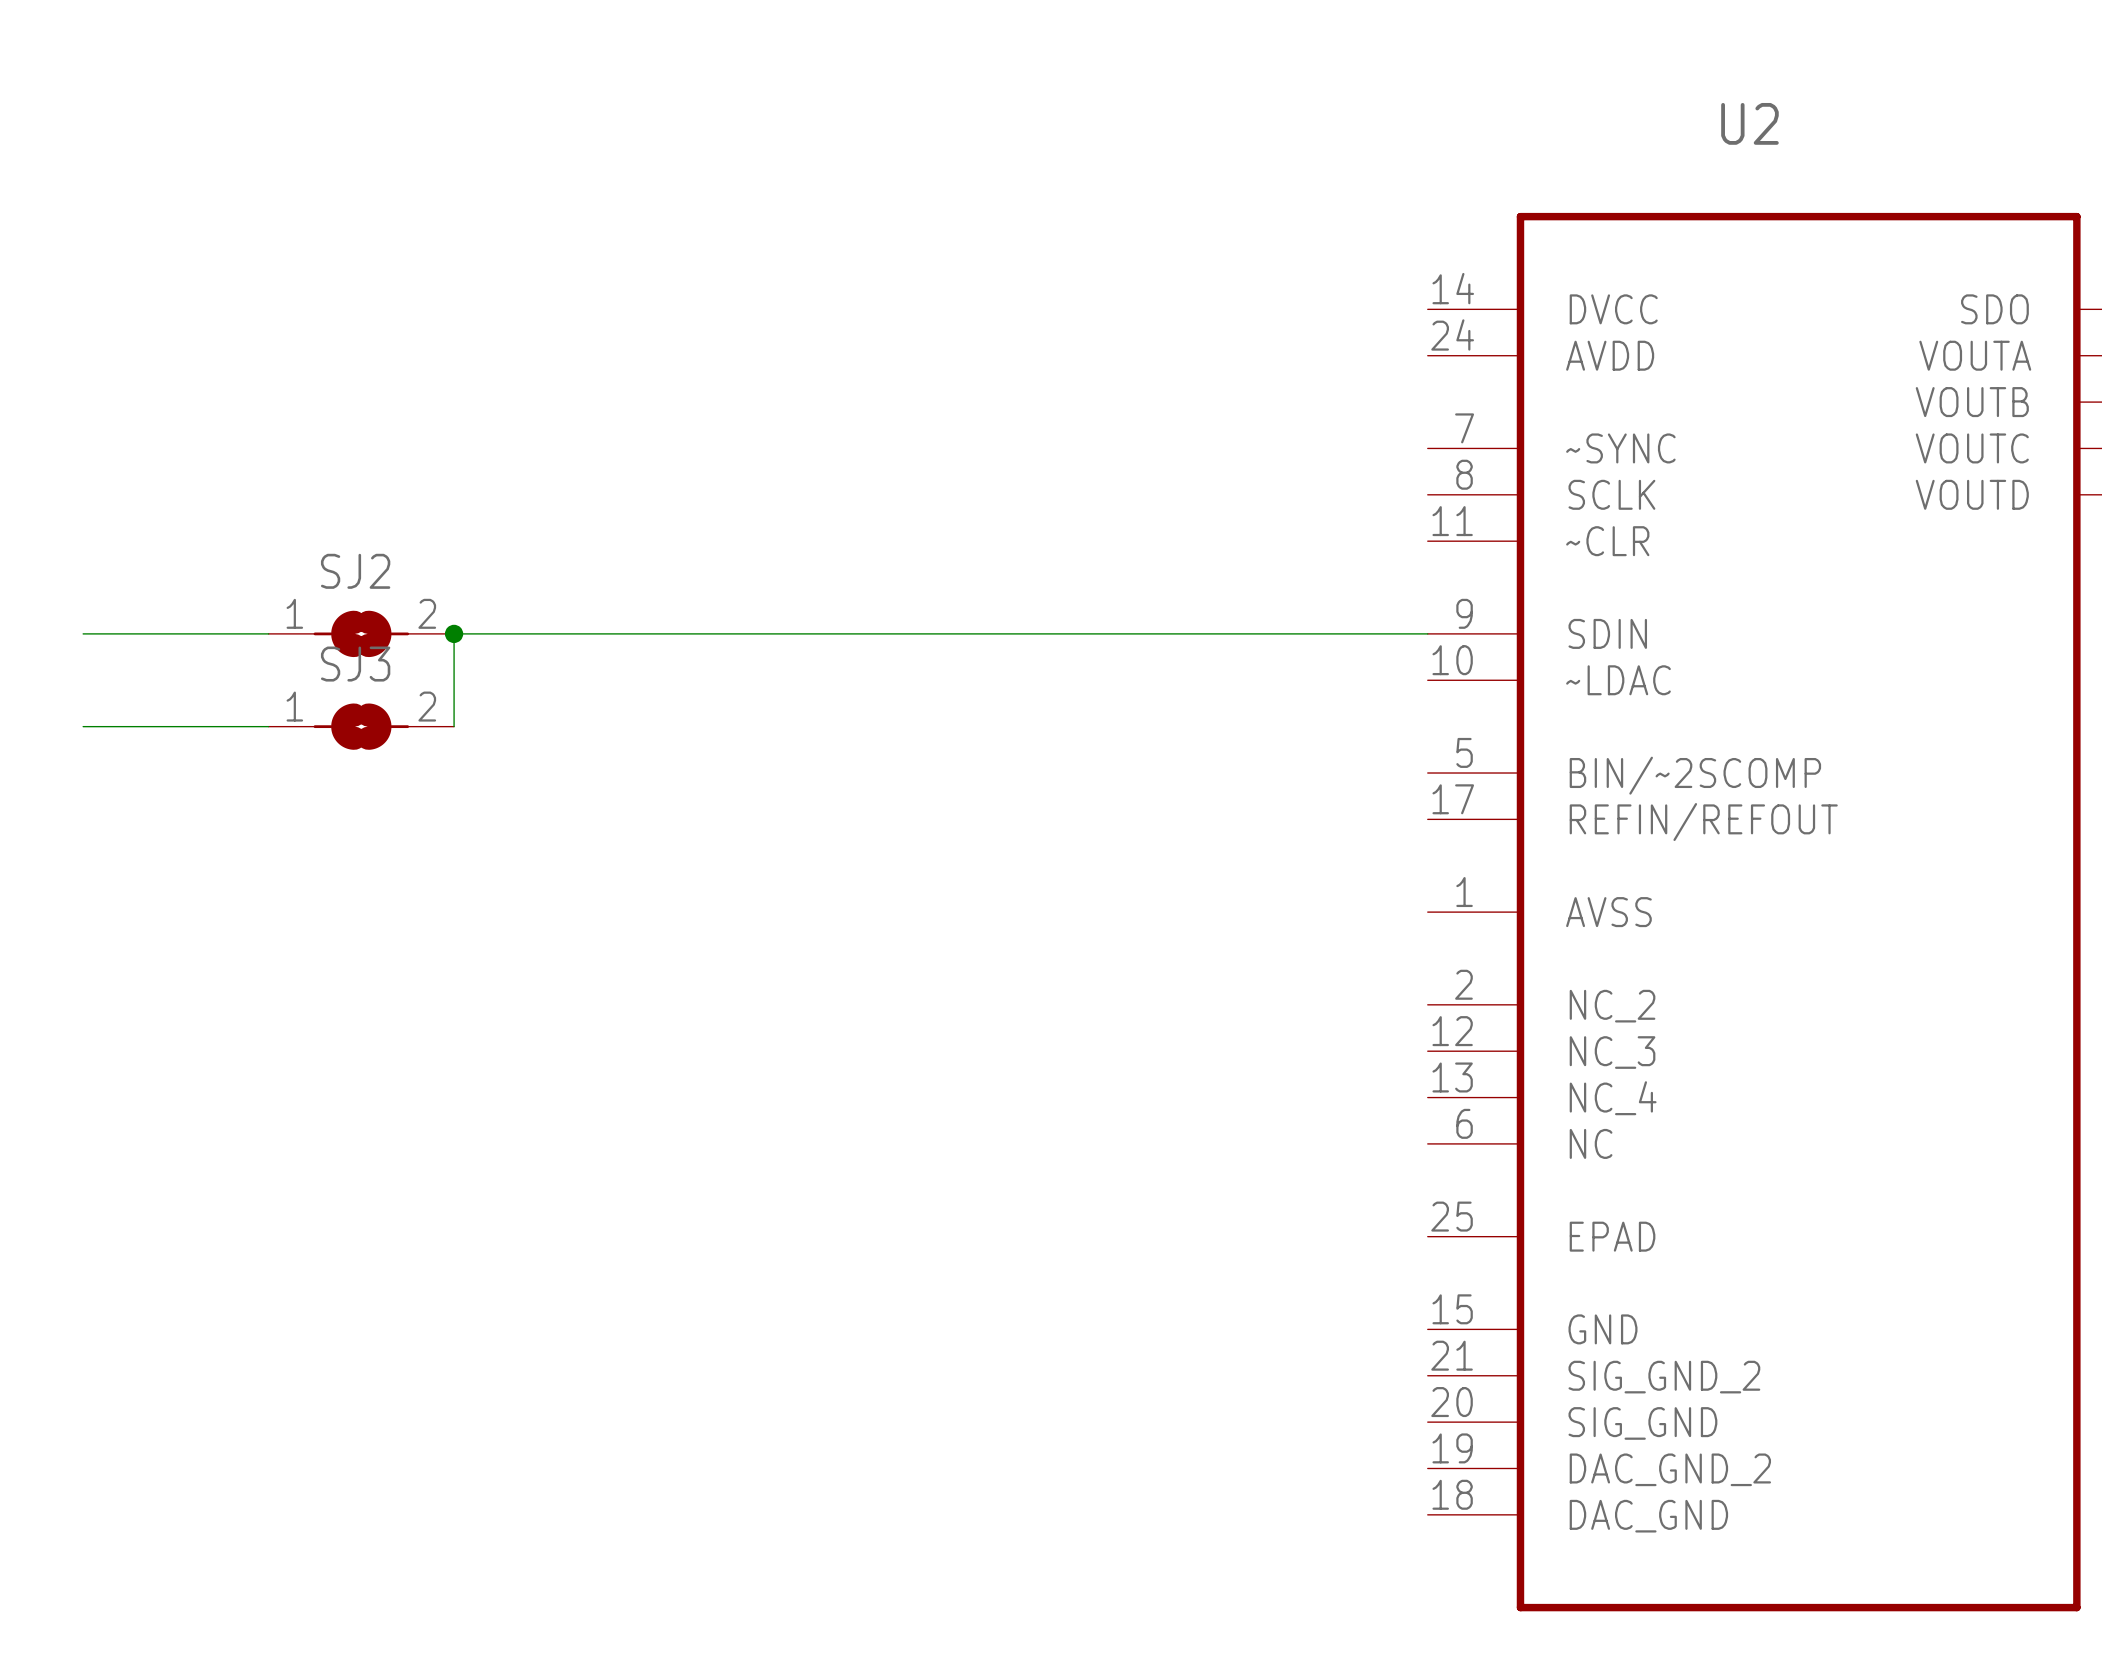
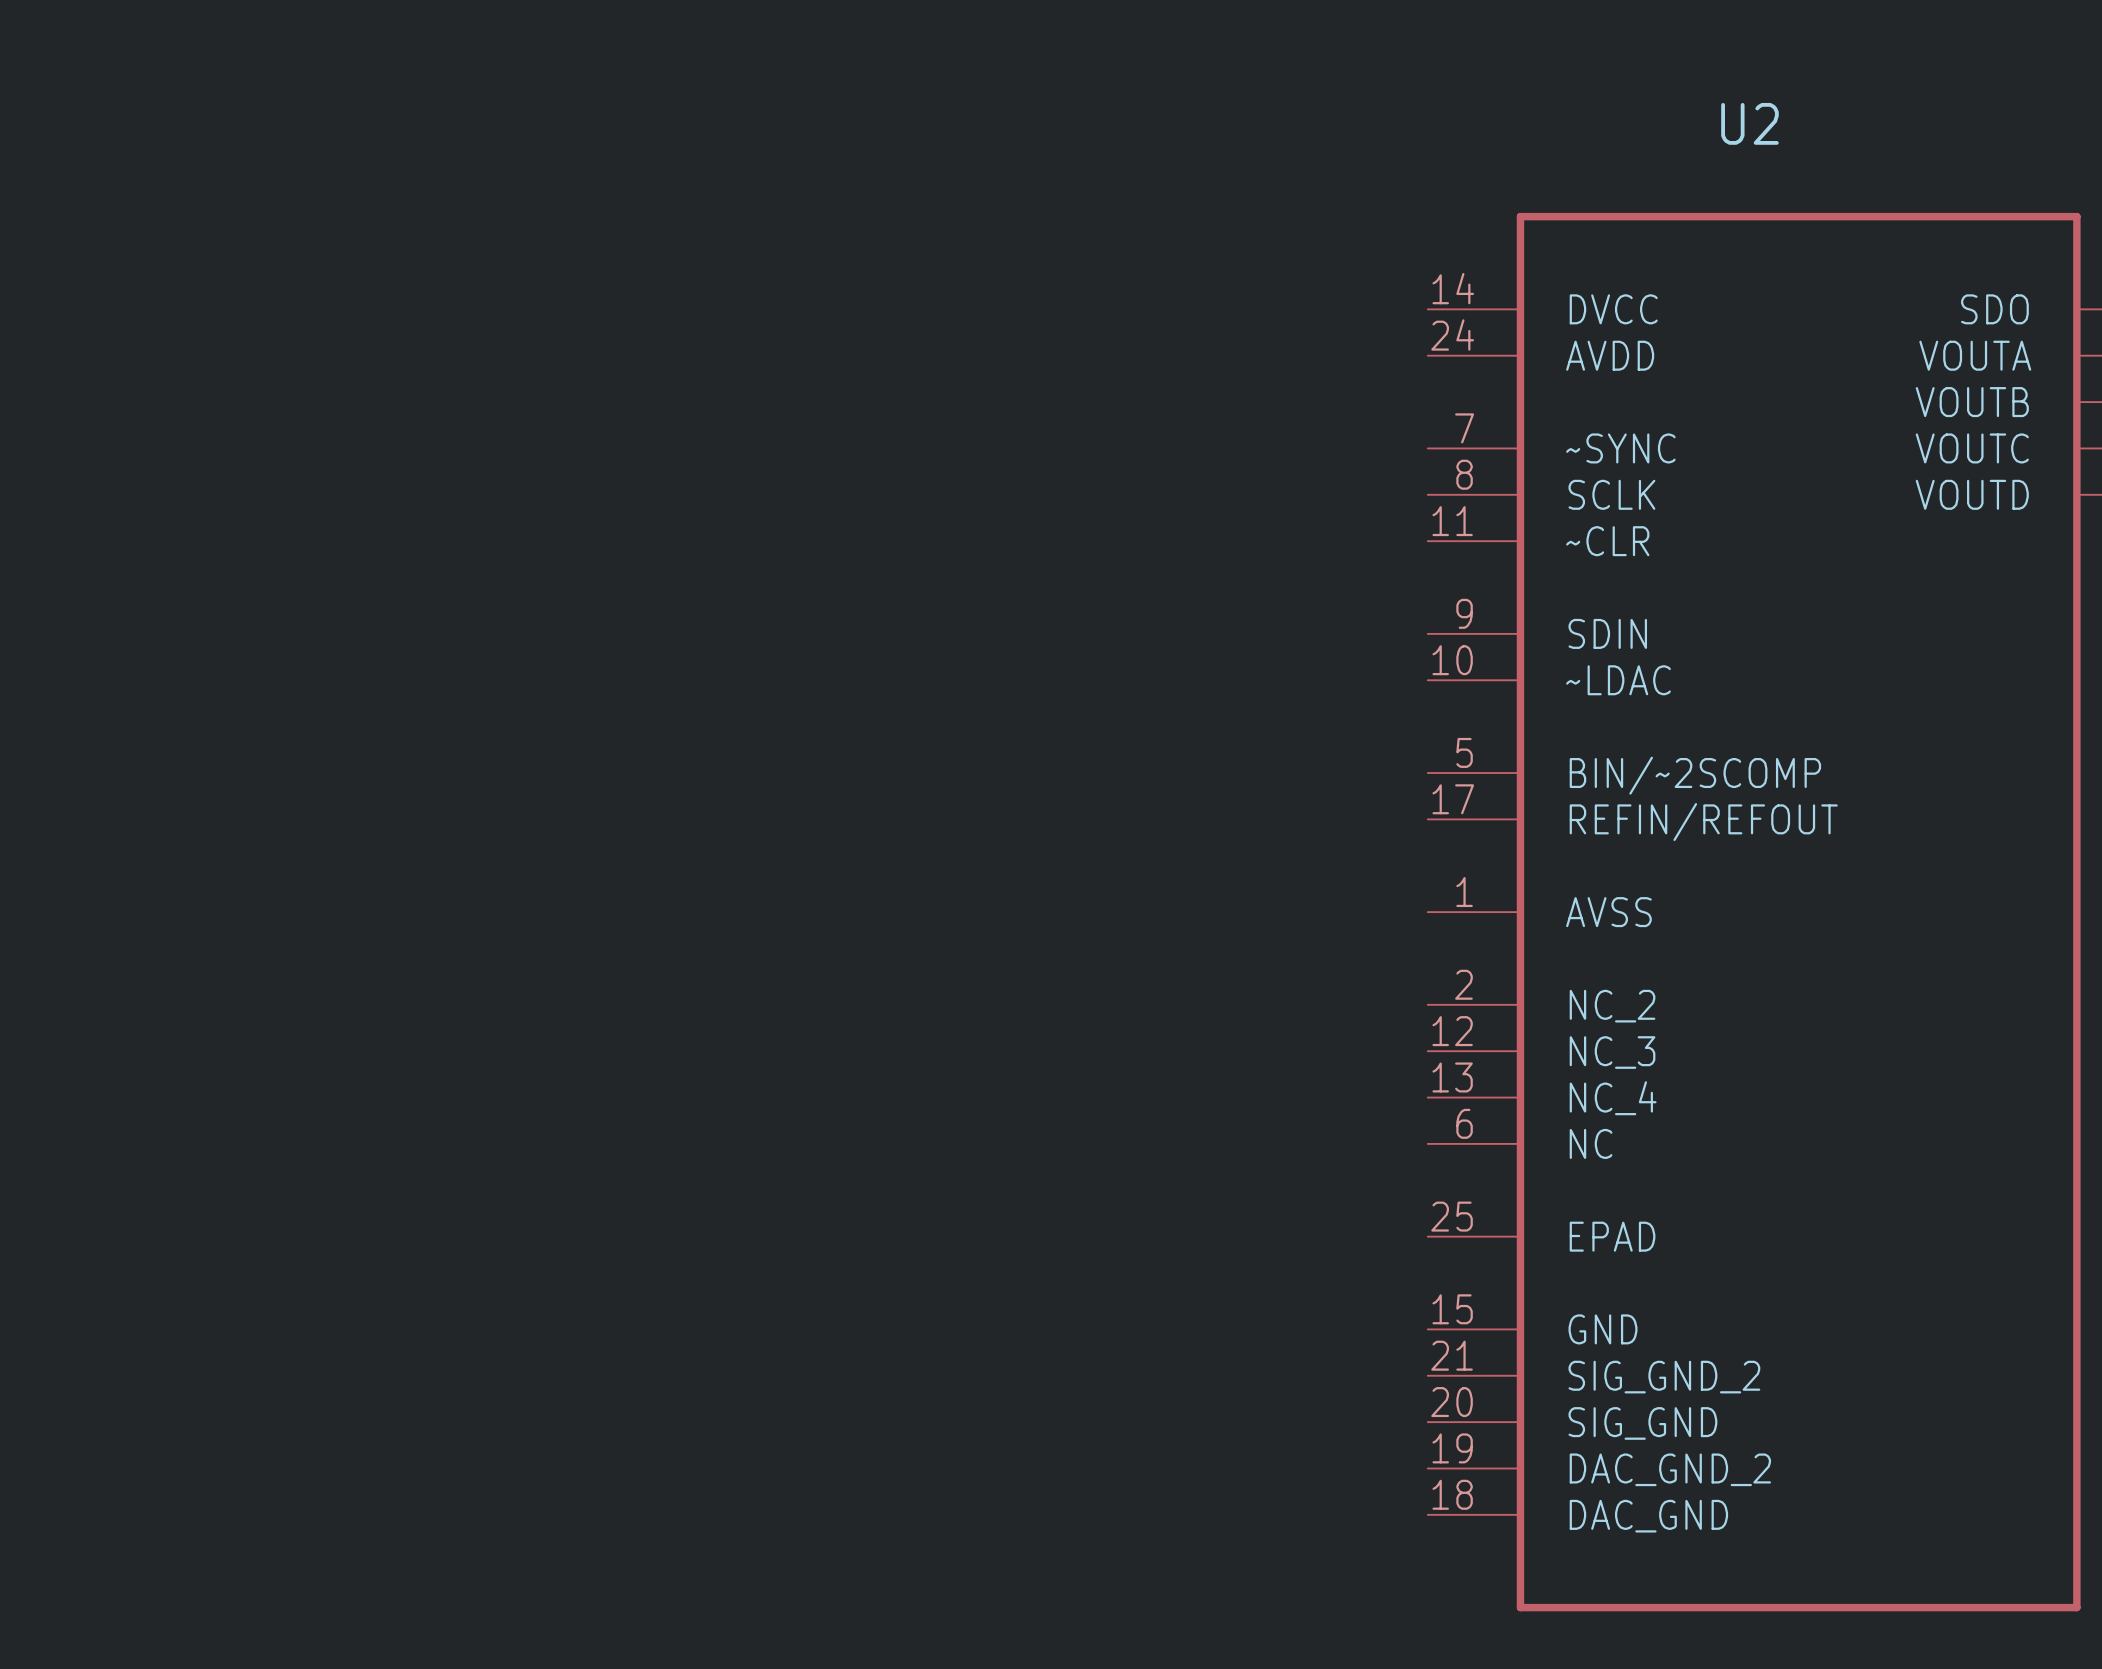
wire: (83, 633) (268, 633) -> none
SJ2: (361, 633) -> none
junction: (454, 633) -> none
wire: (1427, 633) (454, 633) (454, 726) -> none
wire: (83, 726) (268, 726) -> none
SJ3: (361, 726) -> none

